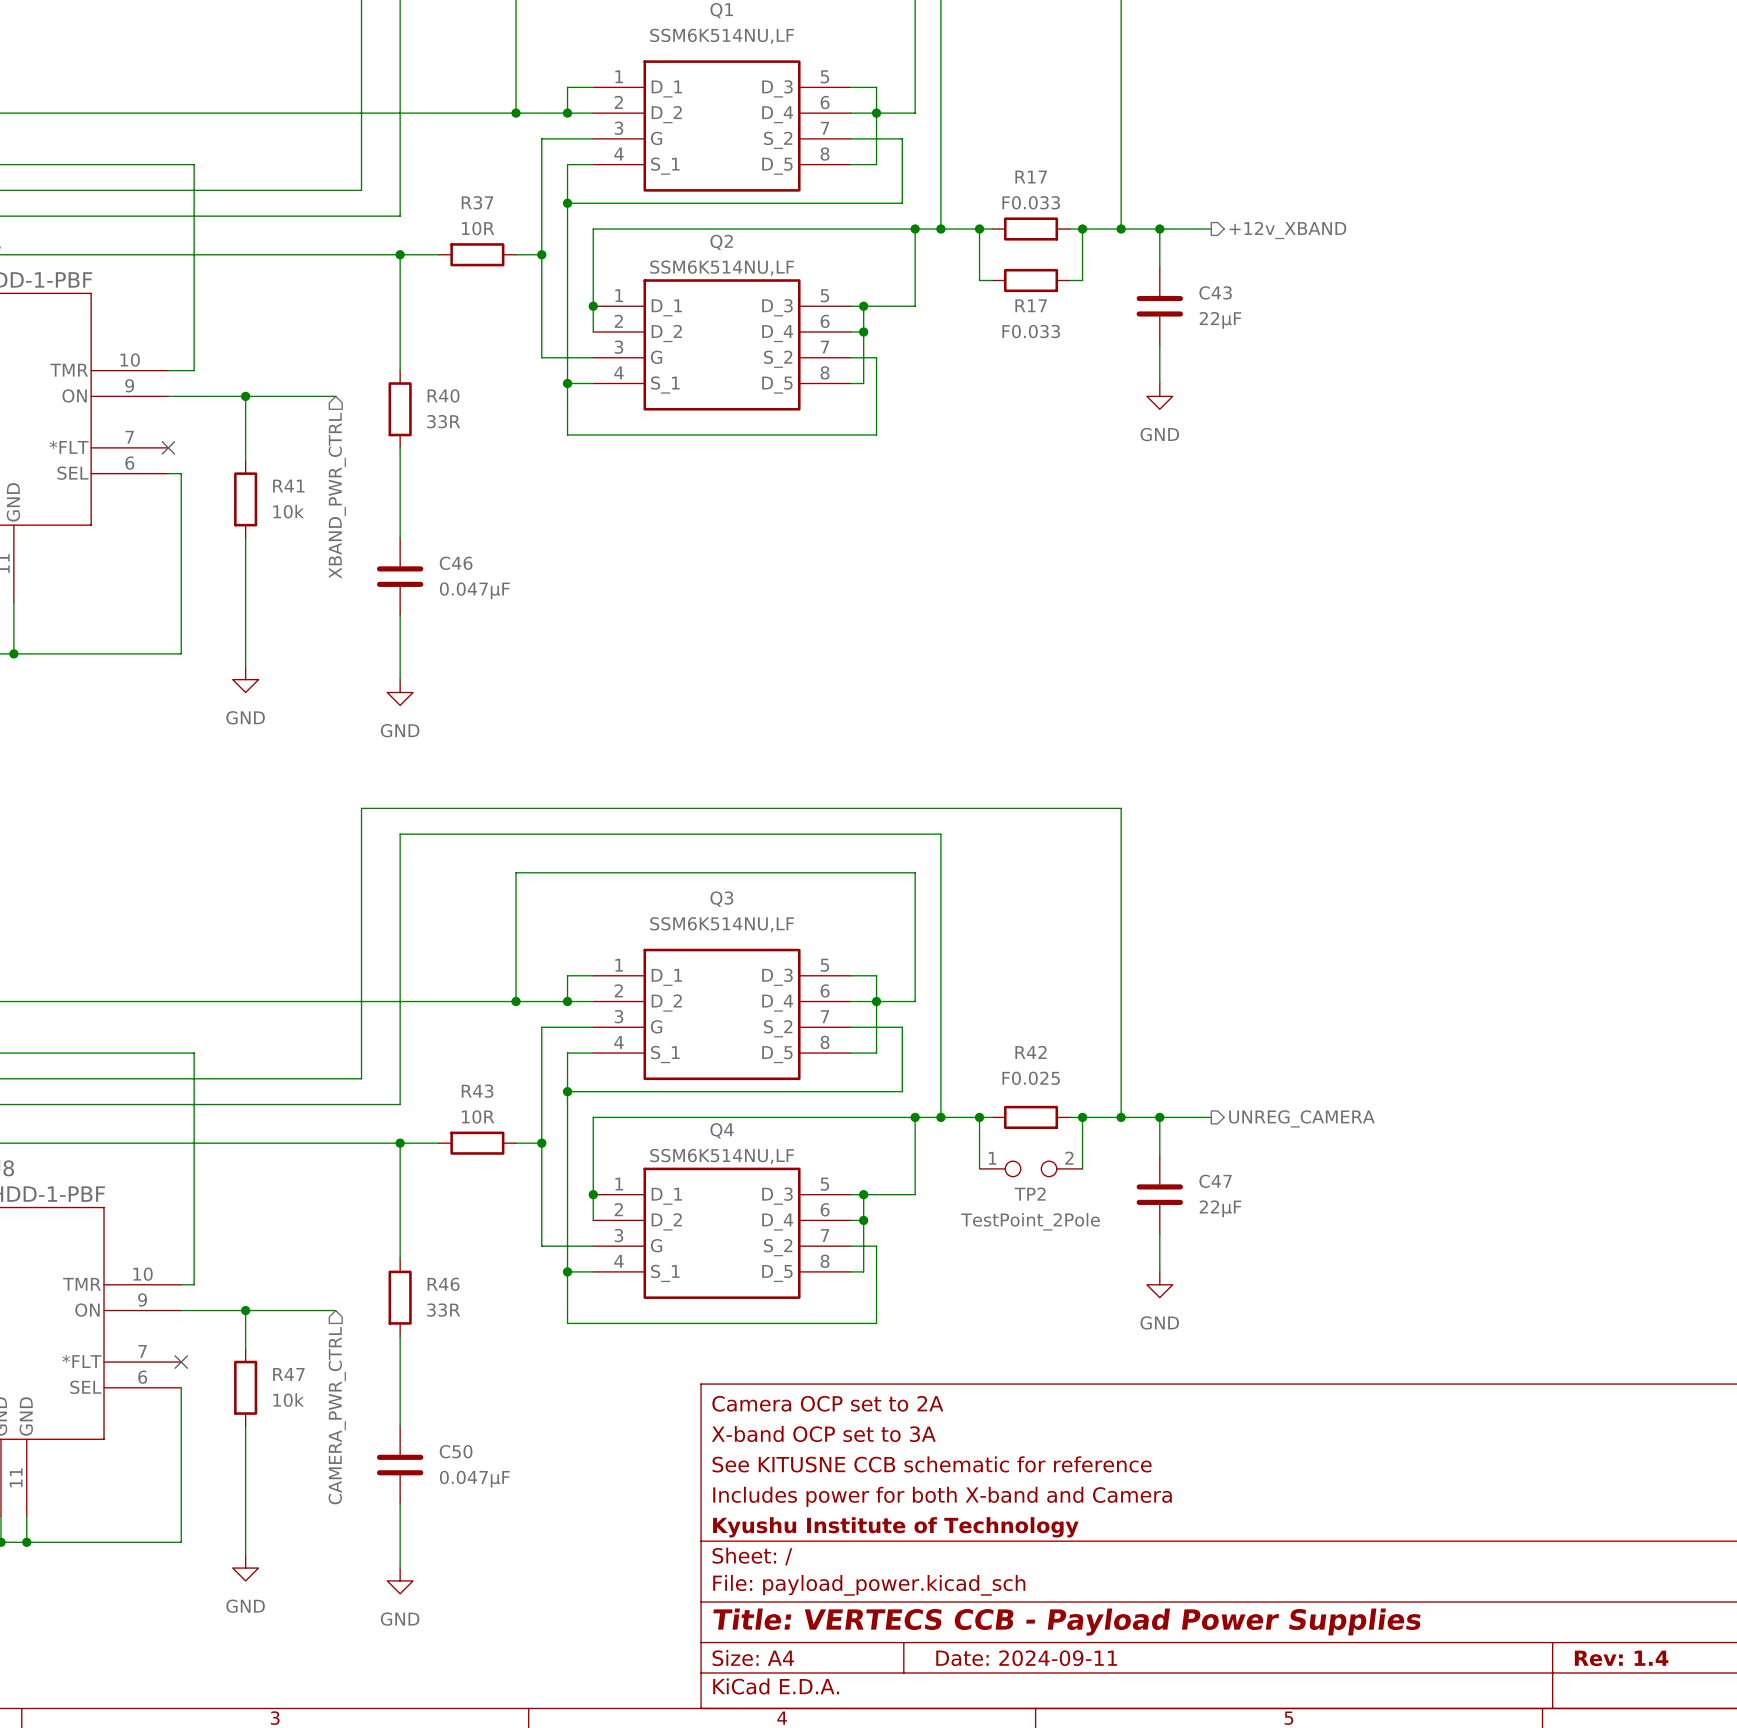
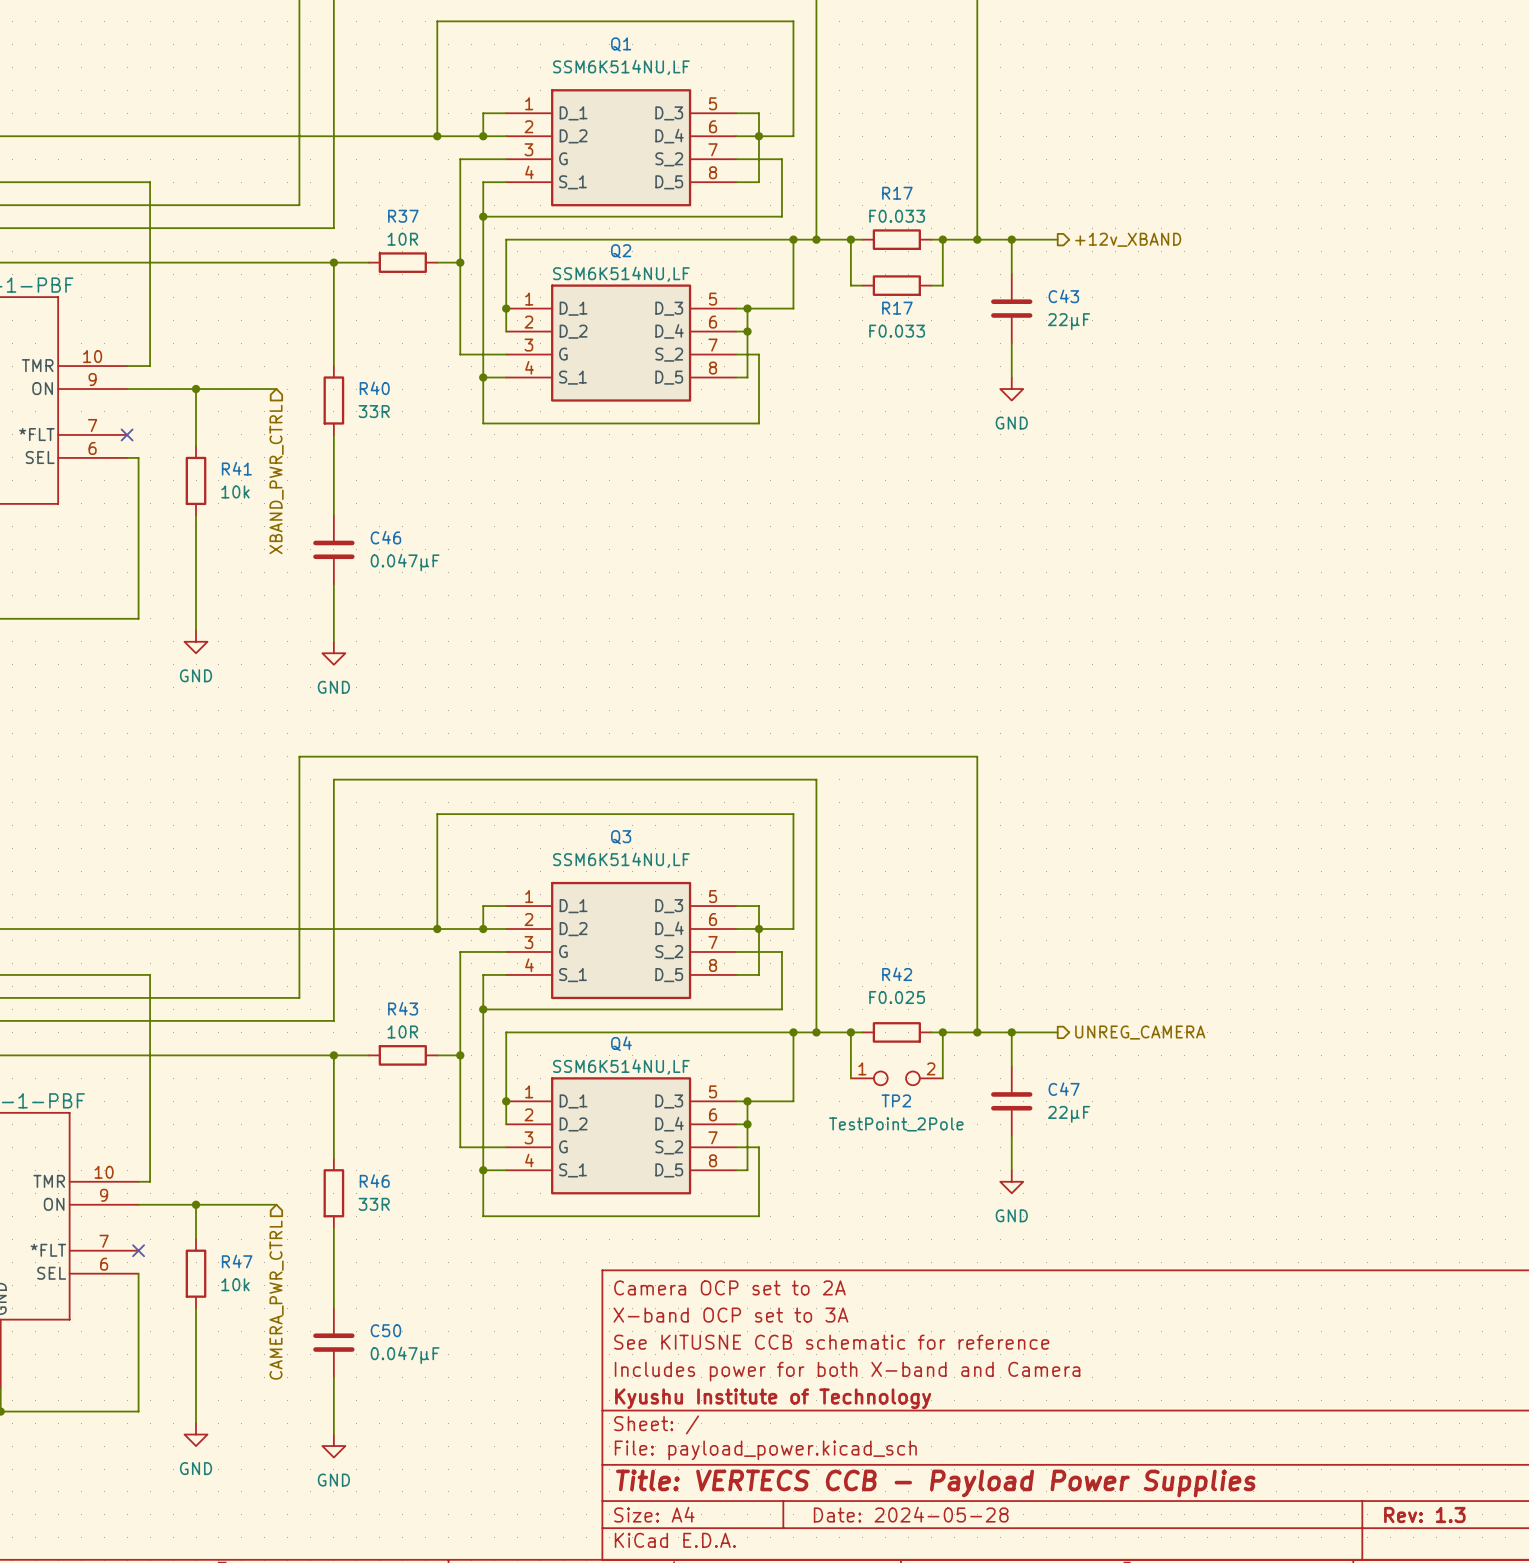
title block: Date: 2024-09-11 (1026, 1658) -> Date: 2024-05-28 (911, 1514)
title block: Rev: 1.4 (1621, 1658) -> Rev: 1.3 (1424, 1515)

